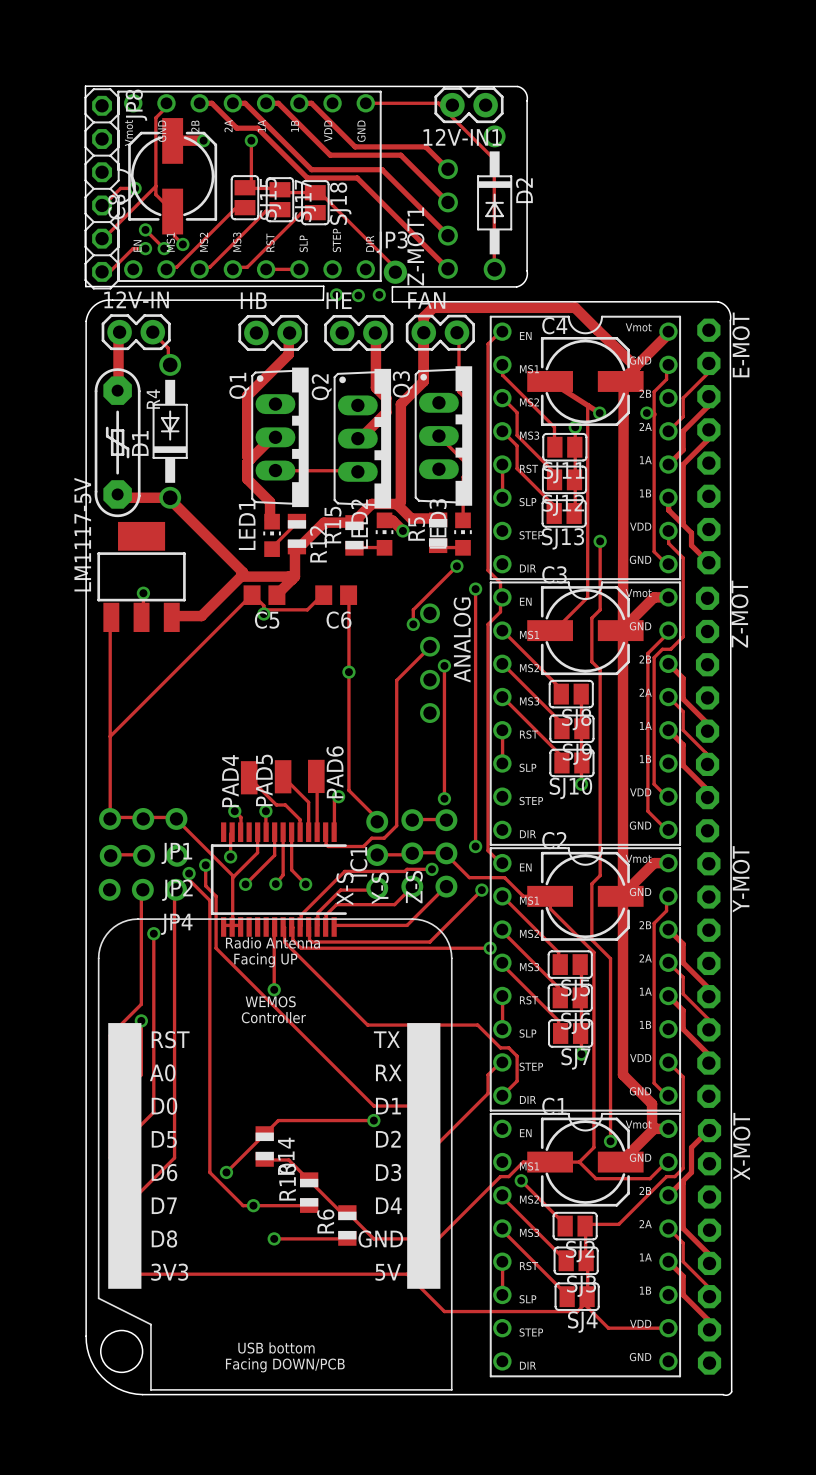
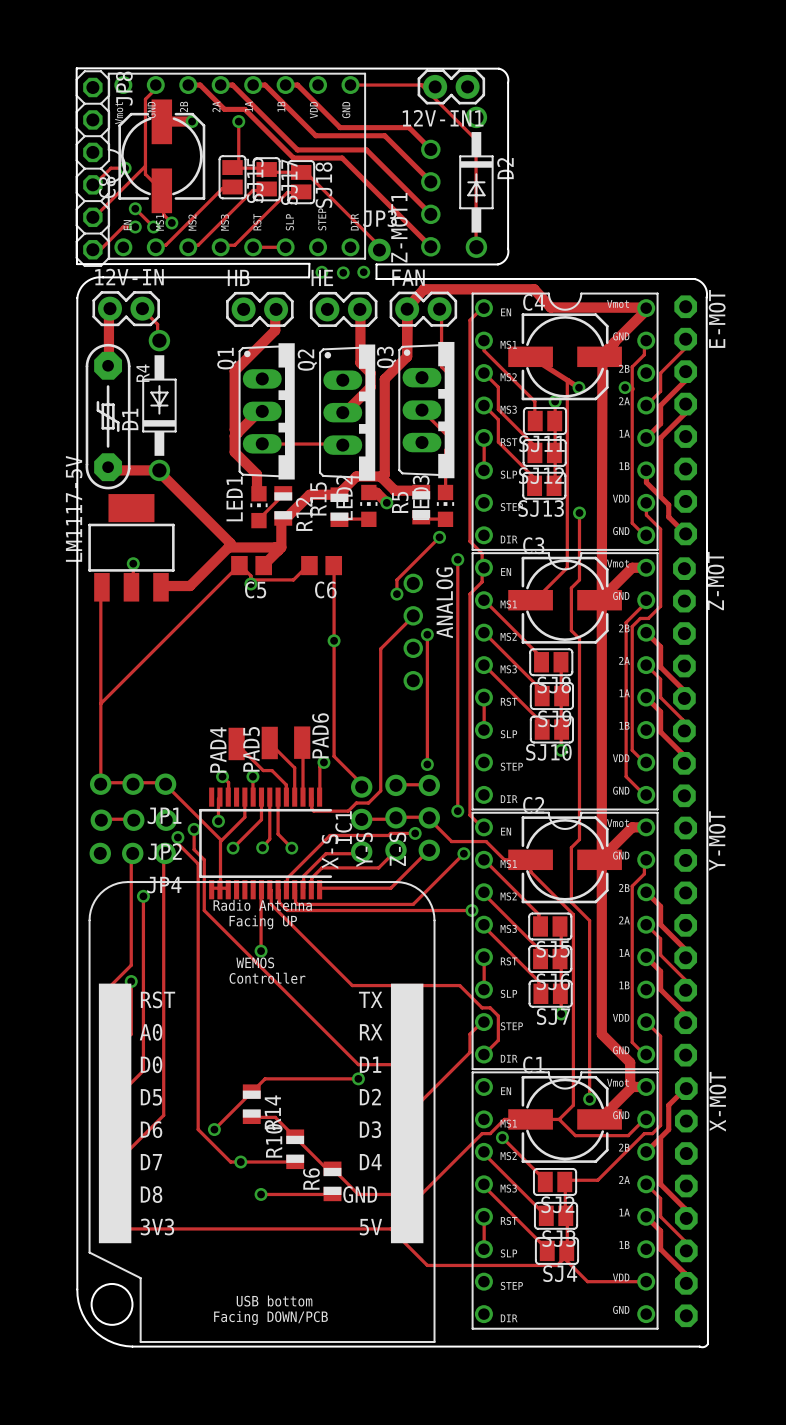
track: (635, 366) (575, 307) (433, 307) (423, 317) (423, 381) -> (646, 307) (550, 307) (534, 289) (423, 289) (407, 307) (407, 356)

